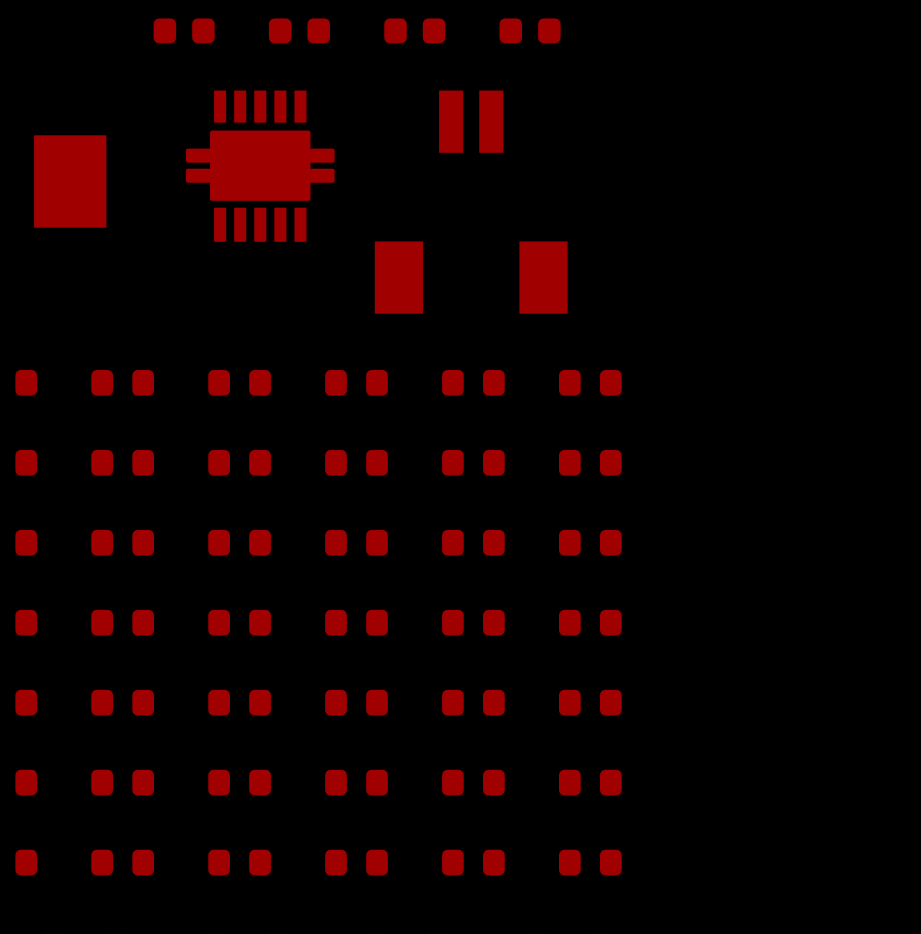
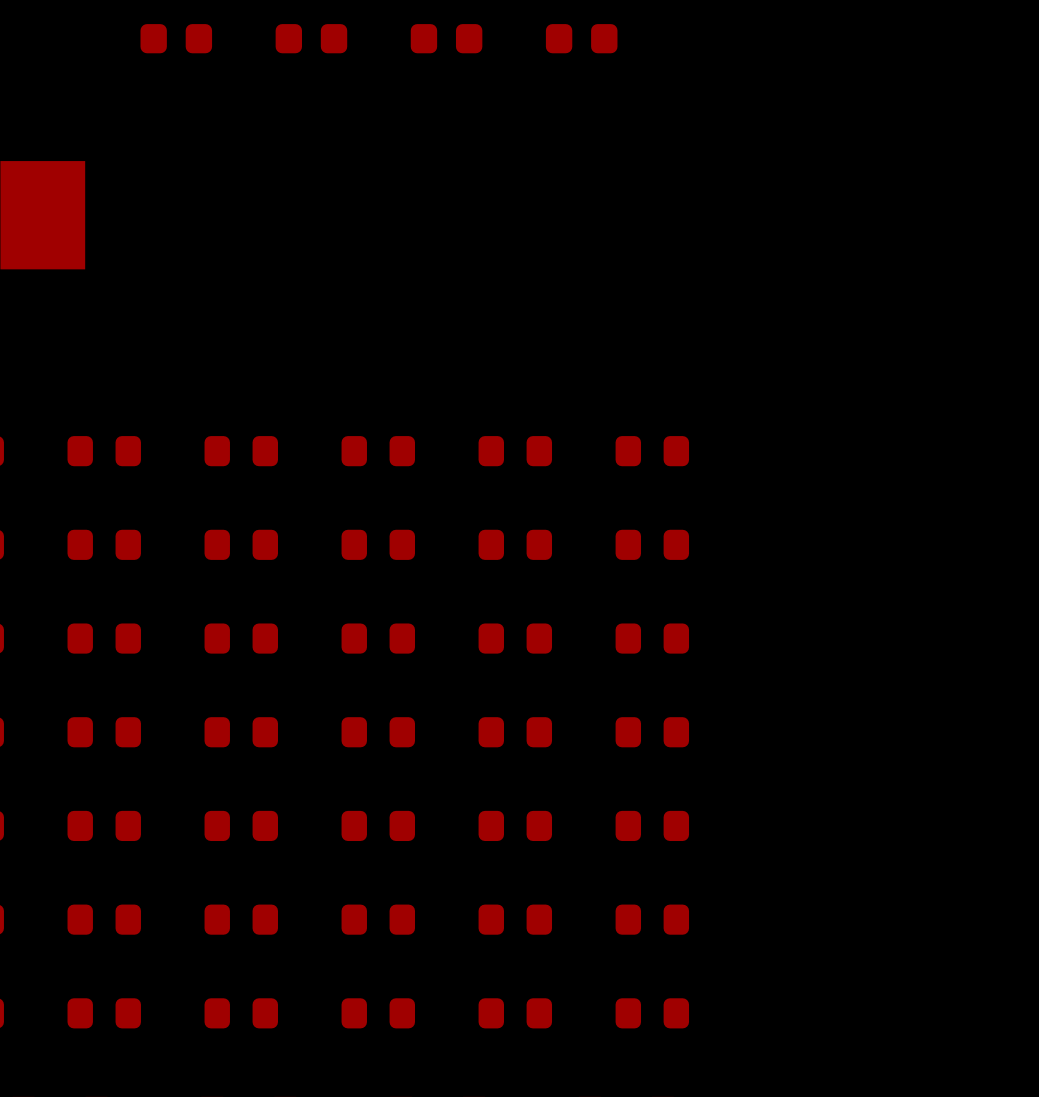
part: (260, 166) -> none
part: (471, 202) -> none

